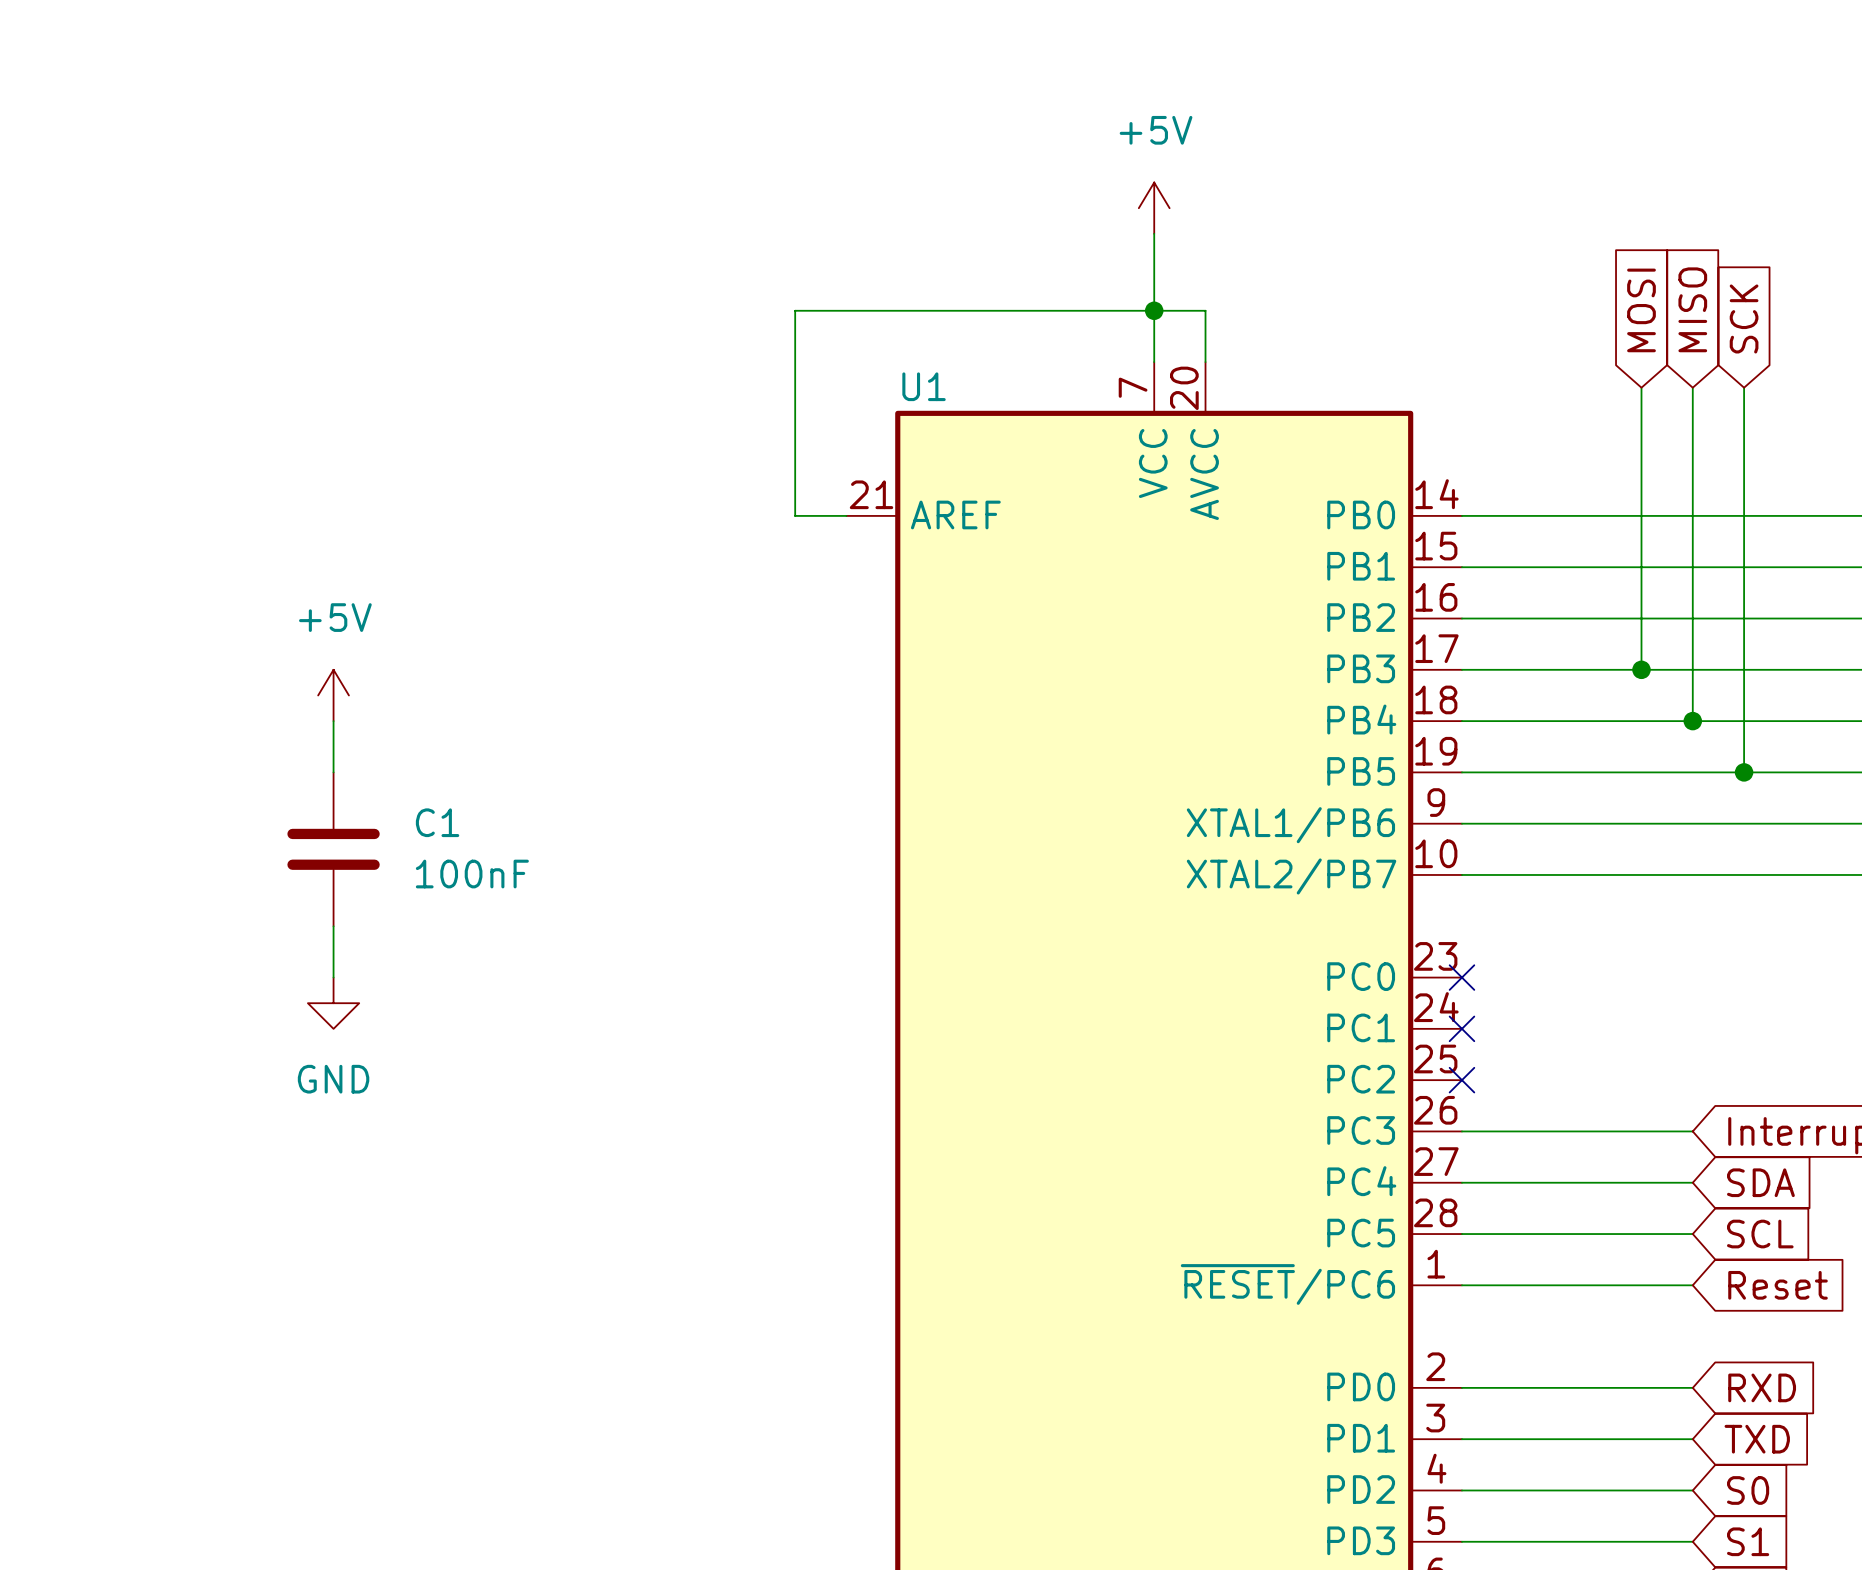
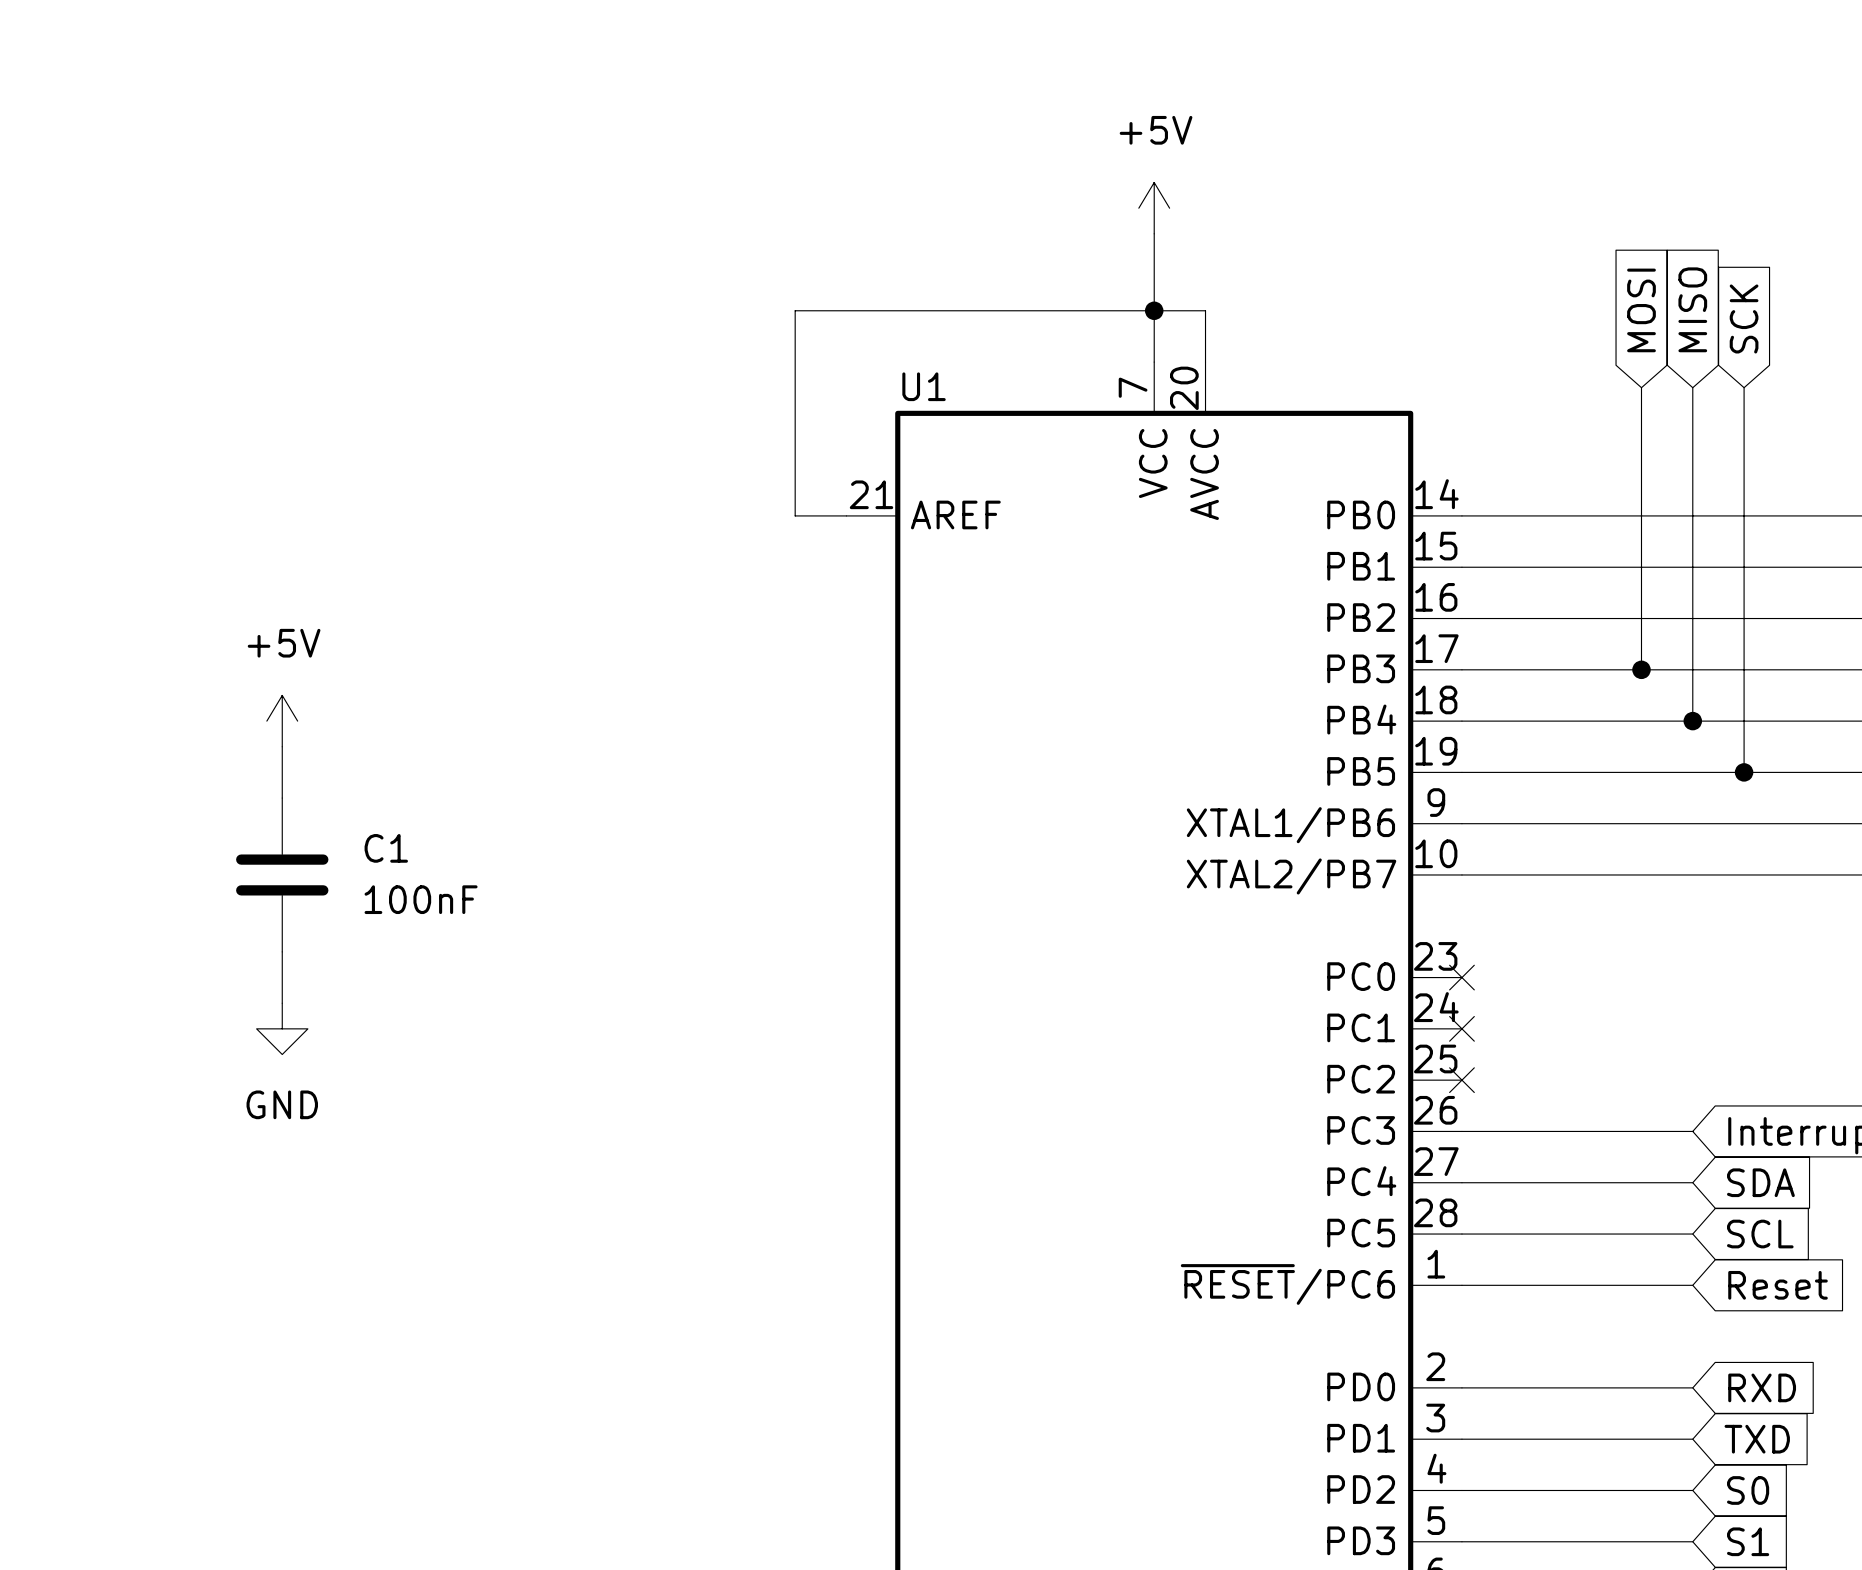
power symbol position: +5V (333, 695) -> +5V (282, 721)
wire: (333, 721) (333, 772) -> (282, 746) (282, 798)
C1 position: (333, 849) -> (282, 874)
wire: (333, 926) (333, 977) -> (282, 951) (282, 1003)
power symbol position: GND (333, 1003) -> GND (282, 1028)

